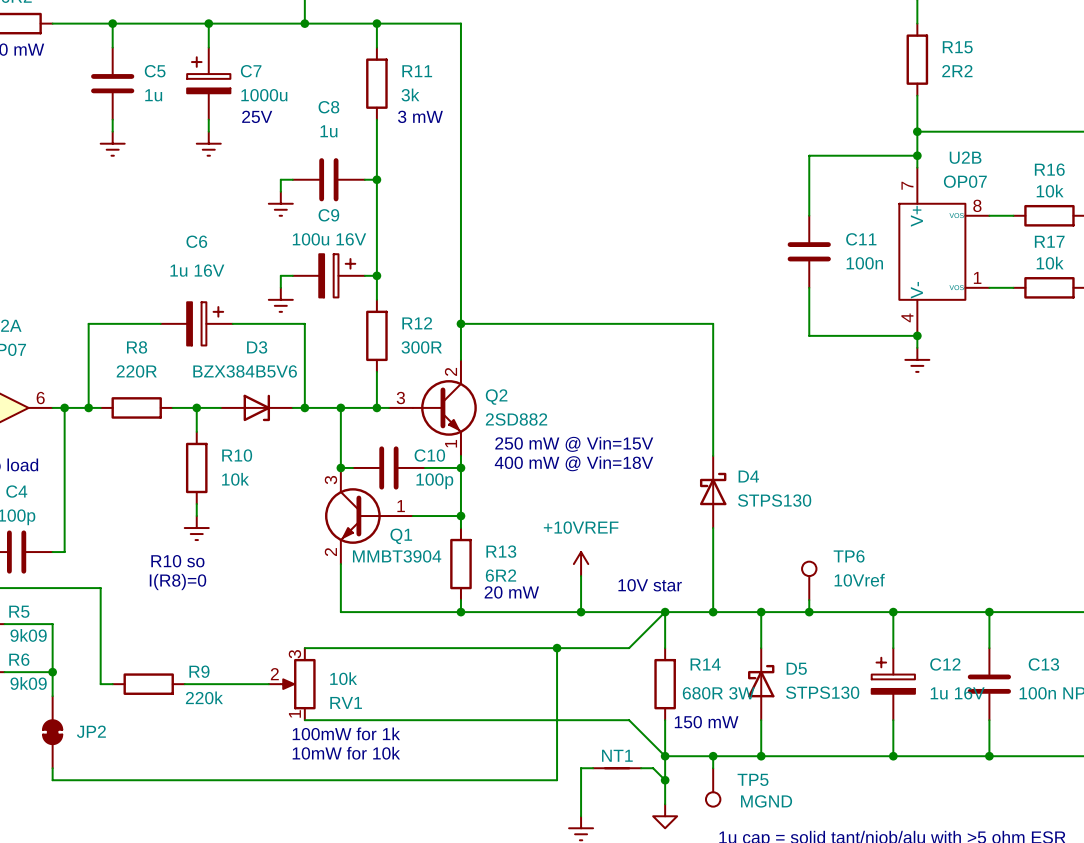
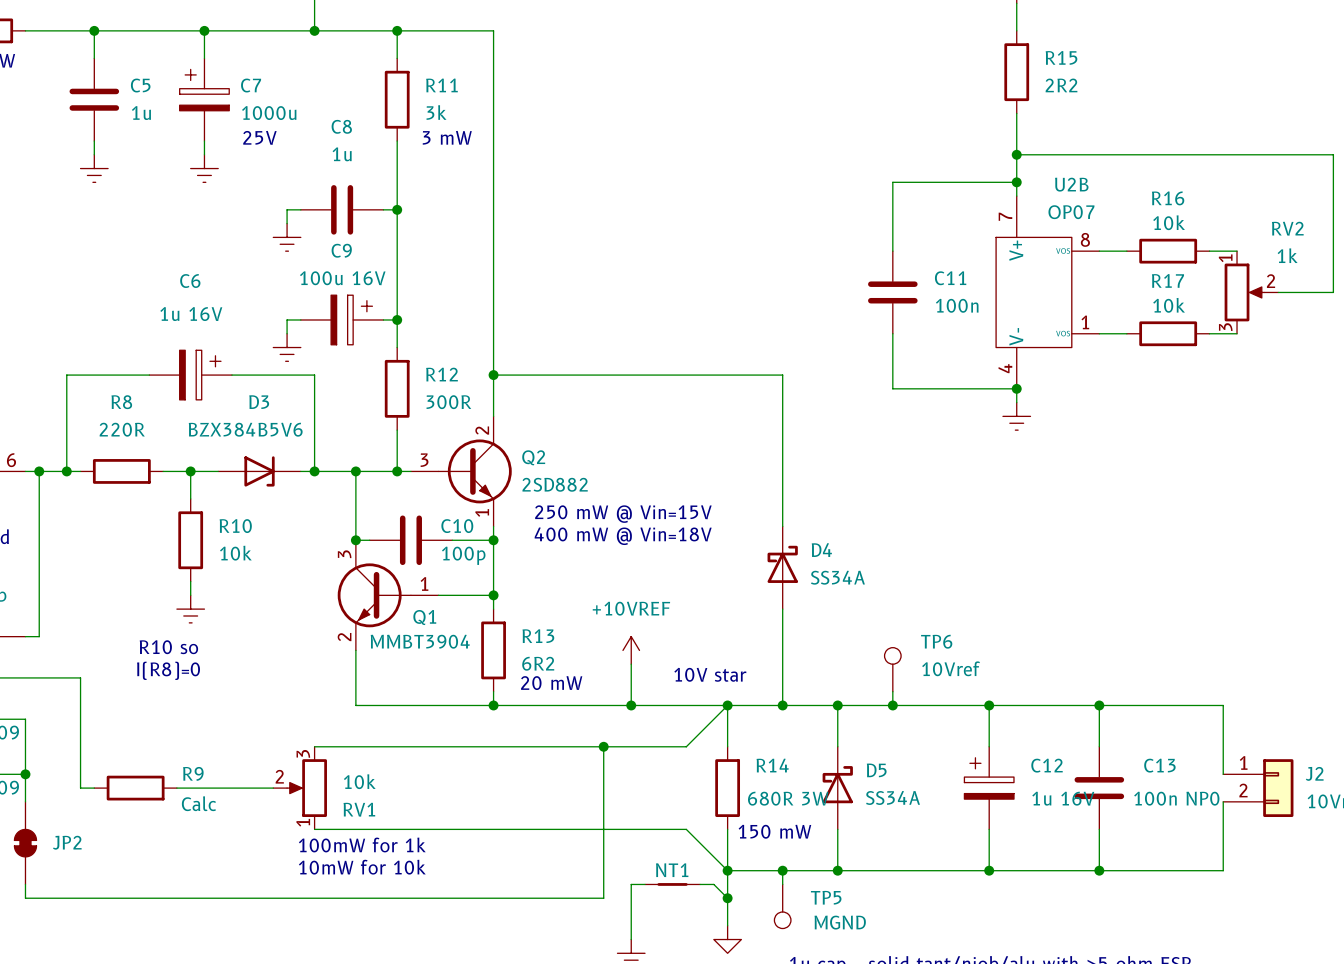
D4 value: STPS130 (774, 500) -> SS34A (837, 577)
D5 value: STPS130 (822, 692) -> SS34A (892, 797)
R9 value: 220k (204, 697) -> Calc (198, 803)

